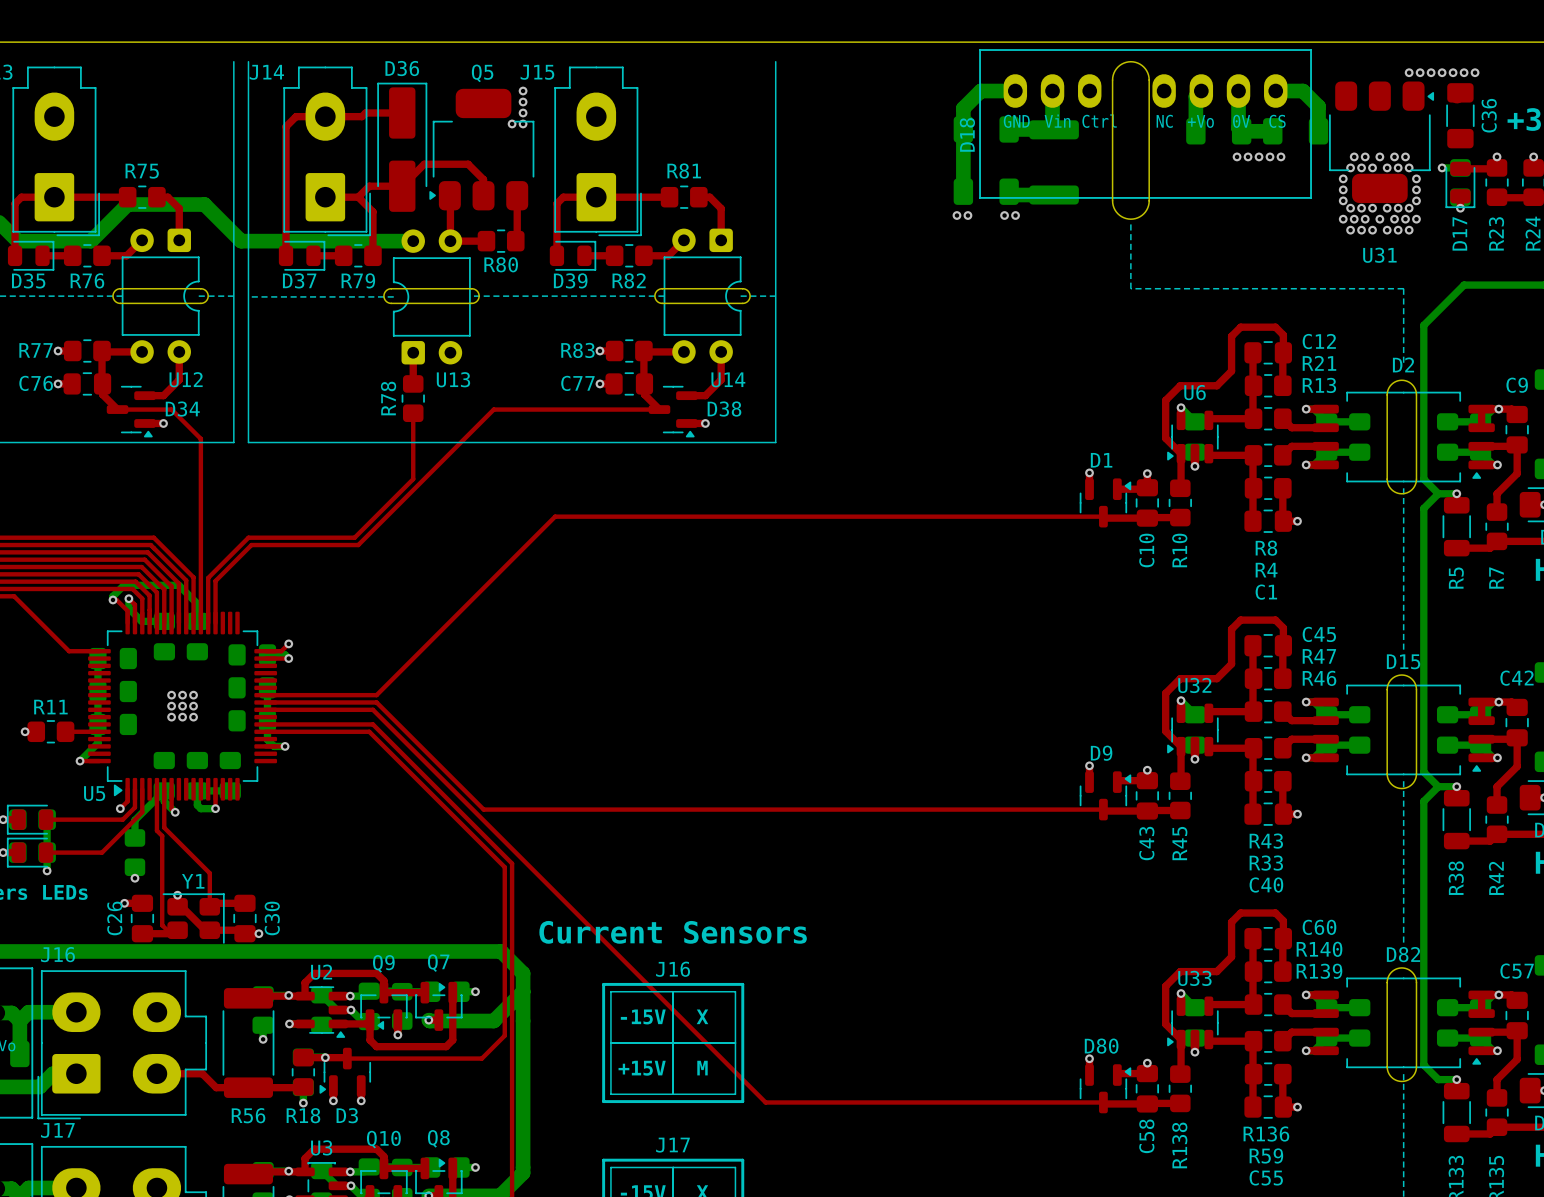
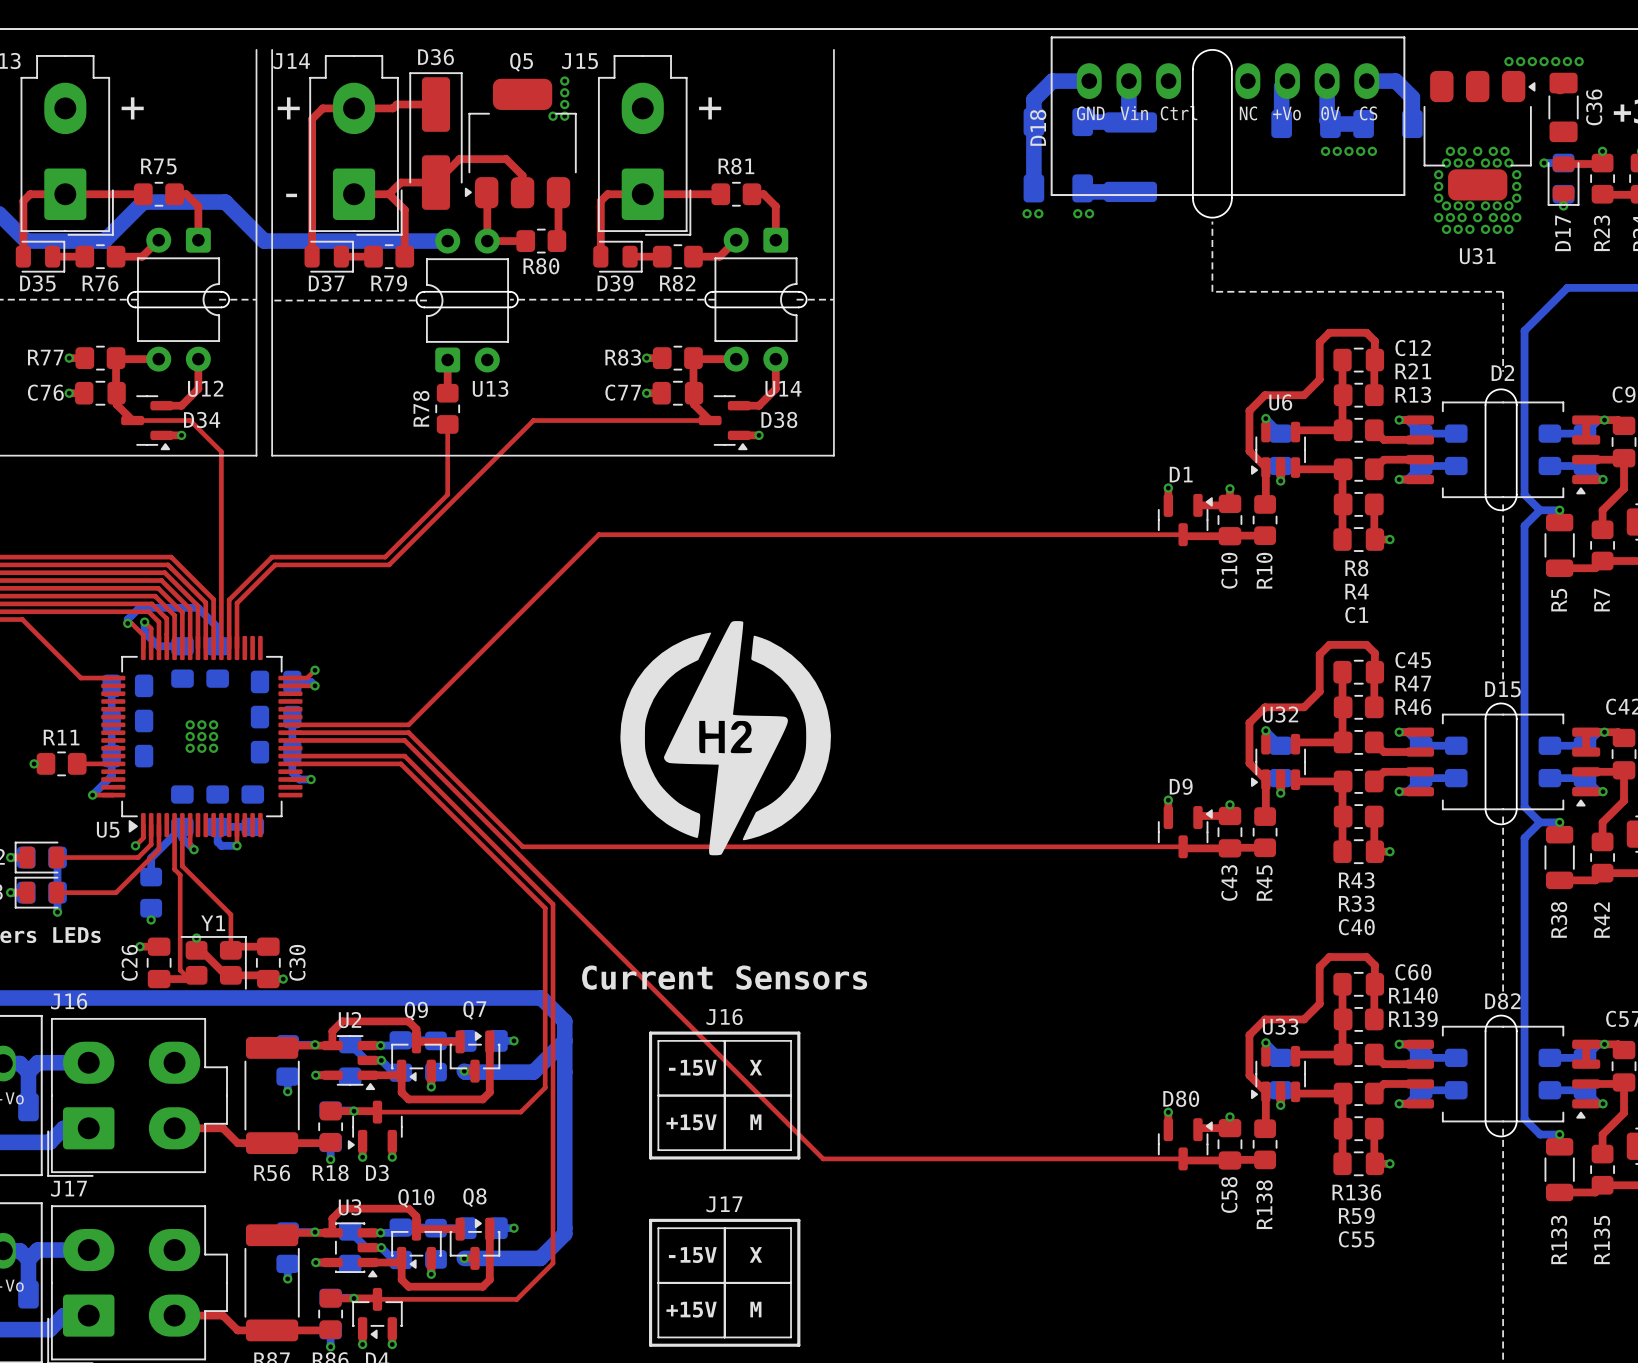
text: none -> + (132, 108)
text: none -> + (288, 108)
text: none -> + (710, 108)
text: none -> - (291, 195)
drawing: none -> [620, 621, 831, 856]

